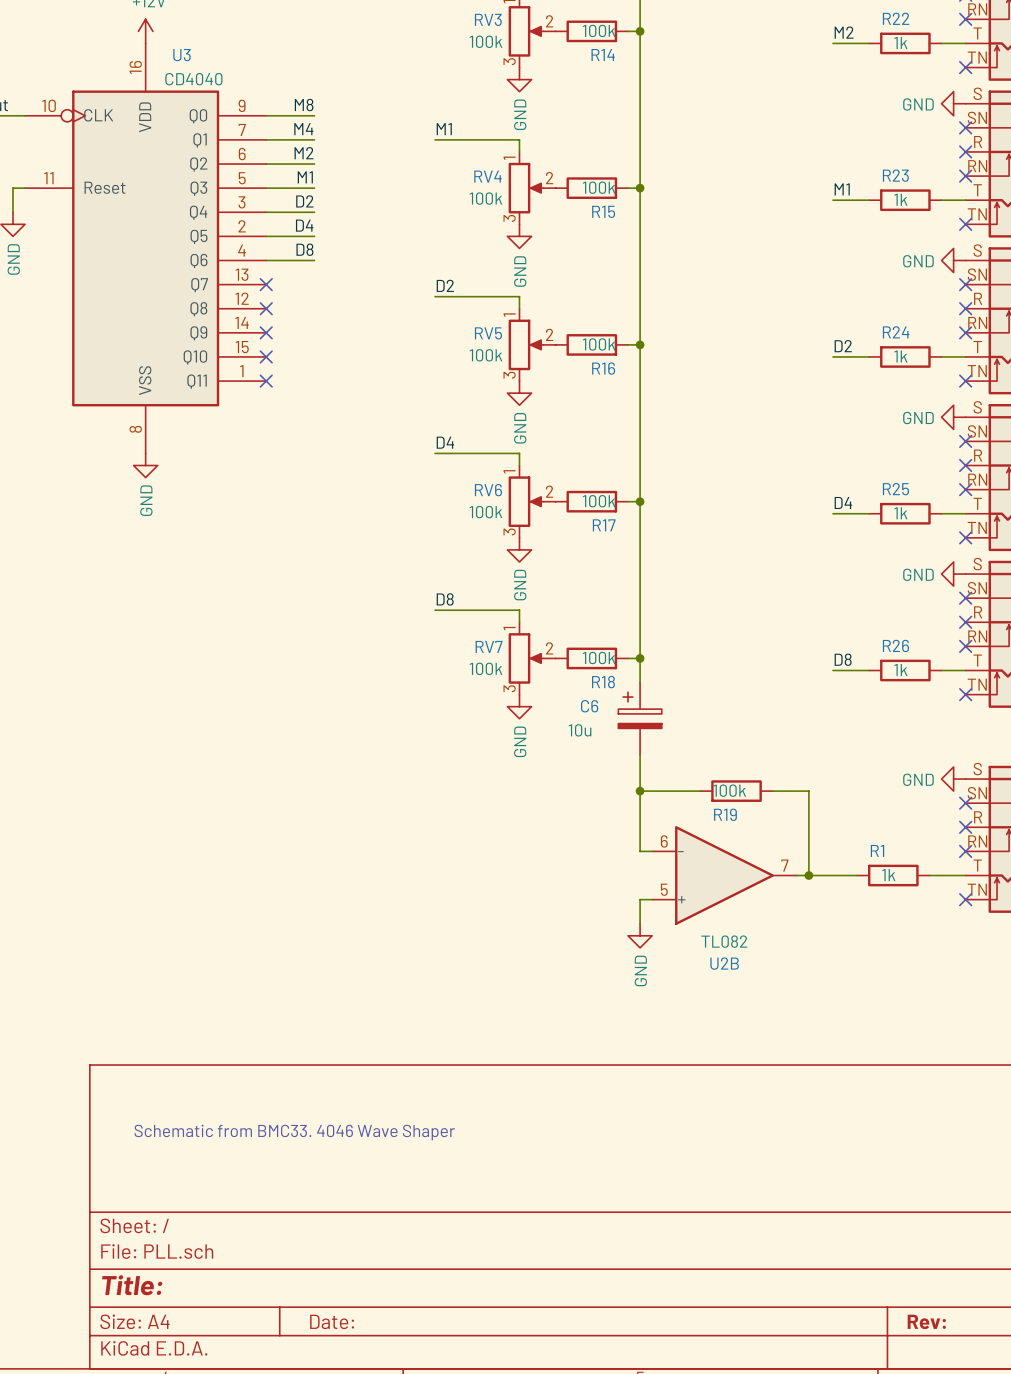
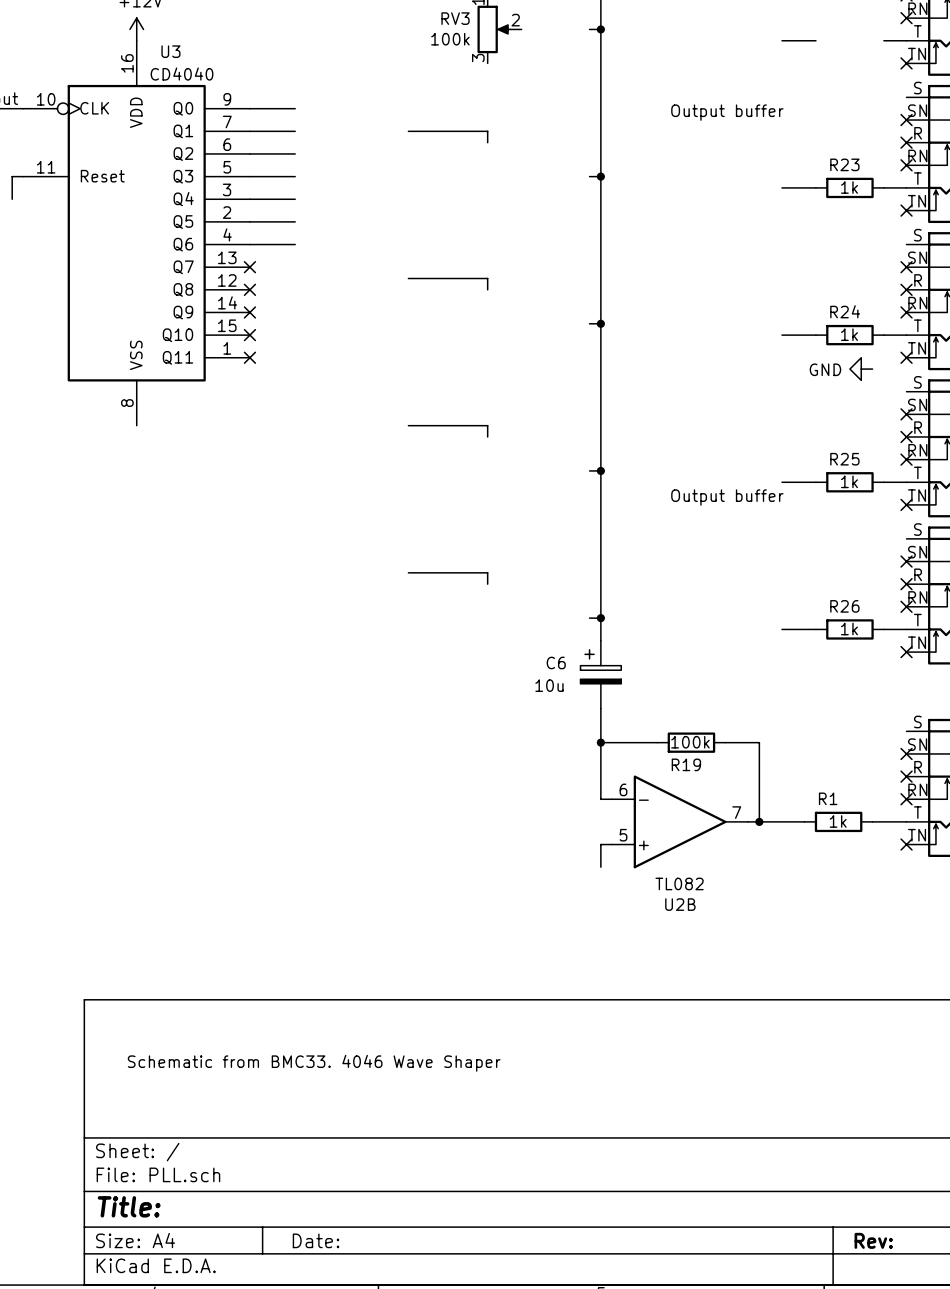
R14: 100k (591, 31) -> none
label: M2 (844, 32) -> none
R22: 1k (905, 43) -> none
power symbol: GND (519, 79) -> none
power symbol: GND (953, 103) -> none
label: M8 (304, 105) -> none
text: none -> Output buffer (727, 112)
label: M4 (303, 129) -> none
label: M1 (444, 129) -> none
label: M2 (304, 153) -> none
label: M1 (305, 177) -> none
RV4: 100k (532, 188) -> none
R15: 100k (591, 188) -> none
label: M1 (842, 189) -> none
label: D2 (304, 201) -> none
power symbol: GND (12, 224) -> none
label: D4 (304, 225) -> none
power symbol: GND (519, 236) -> none
label: D8 (304, 249) -> none
power symbol: GND (953, 260) -> none
label: D2 (445, 285) -> none
RV5: 100k (532, 344) -> none
R16: 100k (591, 344) -> none
label: D2 (843, 346) -> none
power symbol: GND (519, 393) -> none
power symbol position: GND (953, 417) -> GND (861, 369)
label: D4 (445, 442) -> none
power symbol: GND (145, 465) -> none
RV6: 100k (532, 501) -> none
R17: 100k (591, 501) -> none
label: D4 (843, 502) -> none
text: none -> Output buffer (727, 497)
power symbol: GND (519, 549) -> none
power symbol: GND (953, 574) -> none
label: D8 (445, 599) -> none
RV7: 100k (532, 658) -> none
R18: 100k (591, 658) -> none
label: D8 (843, 659) -> none
power symbol: GND (519, 706) -> none
power symbol: GND (953, 779) -> none
power symbol: GND (640, 935) -> none

